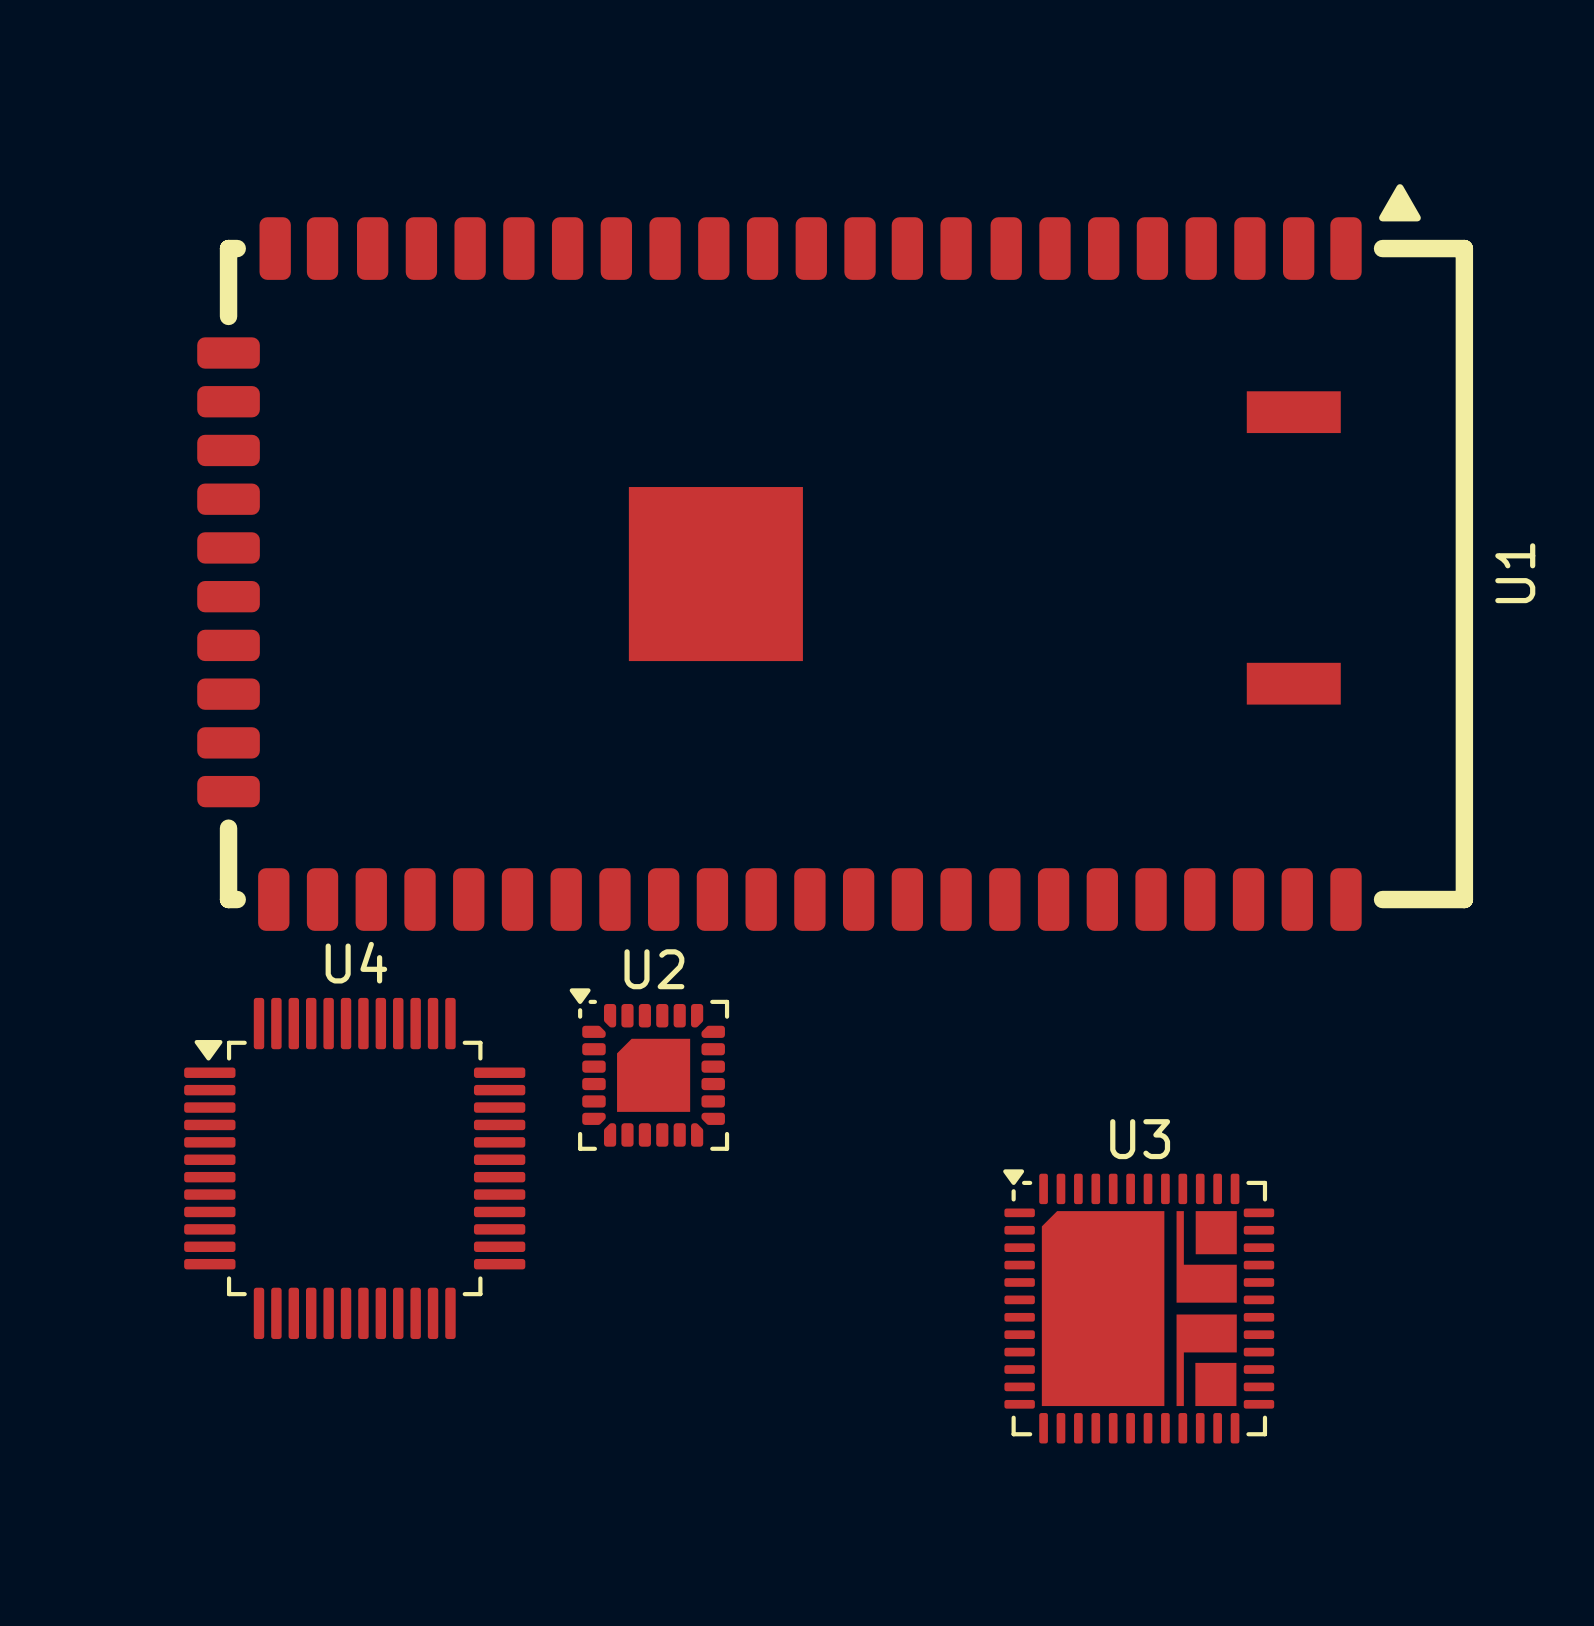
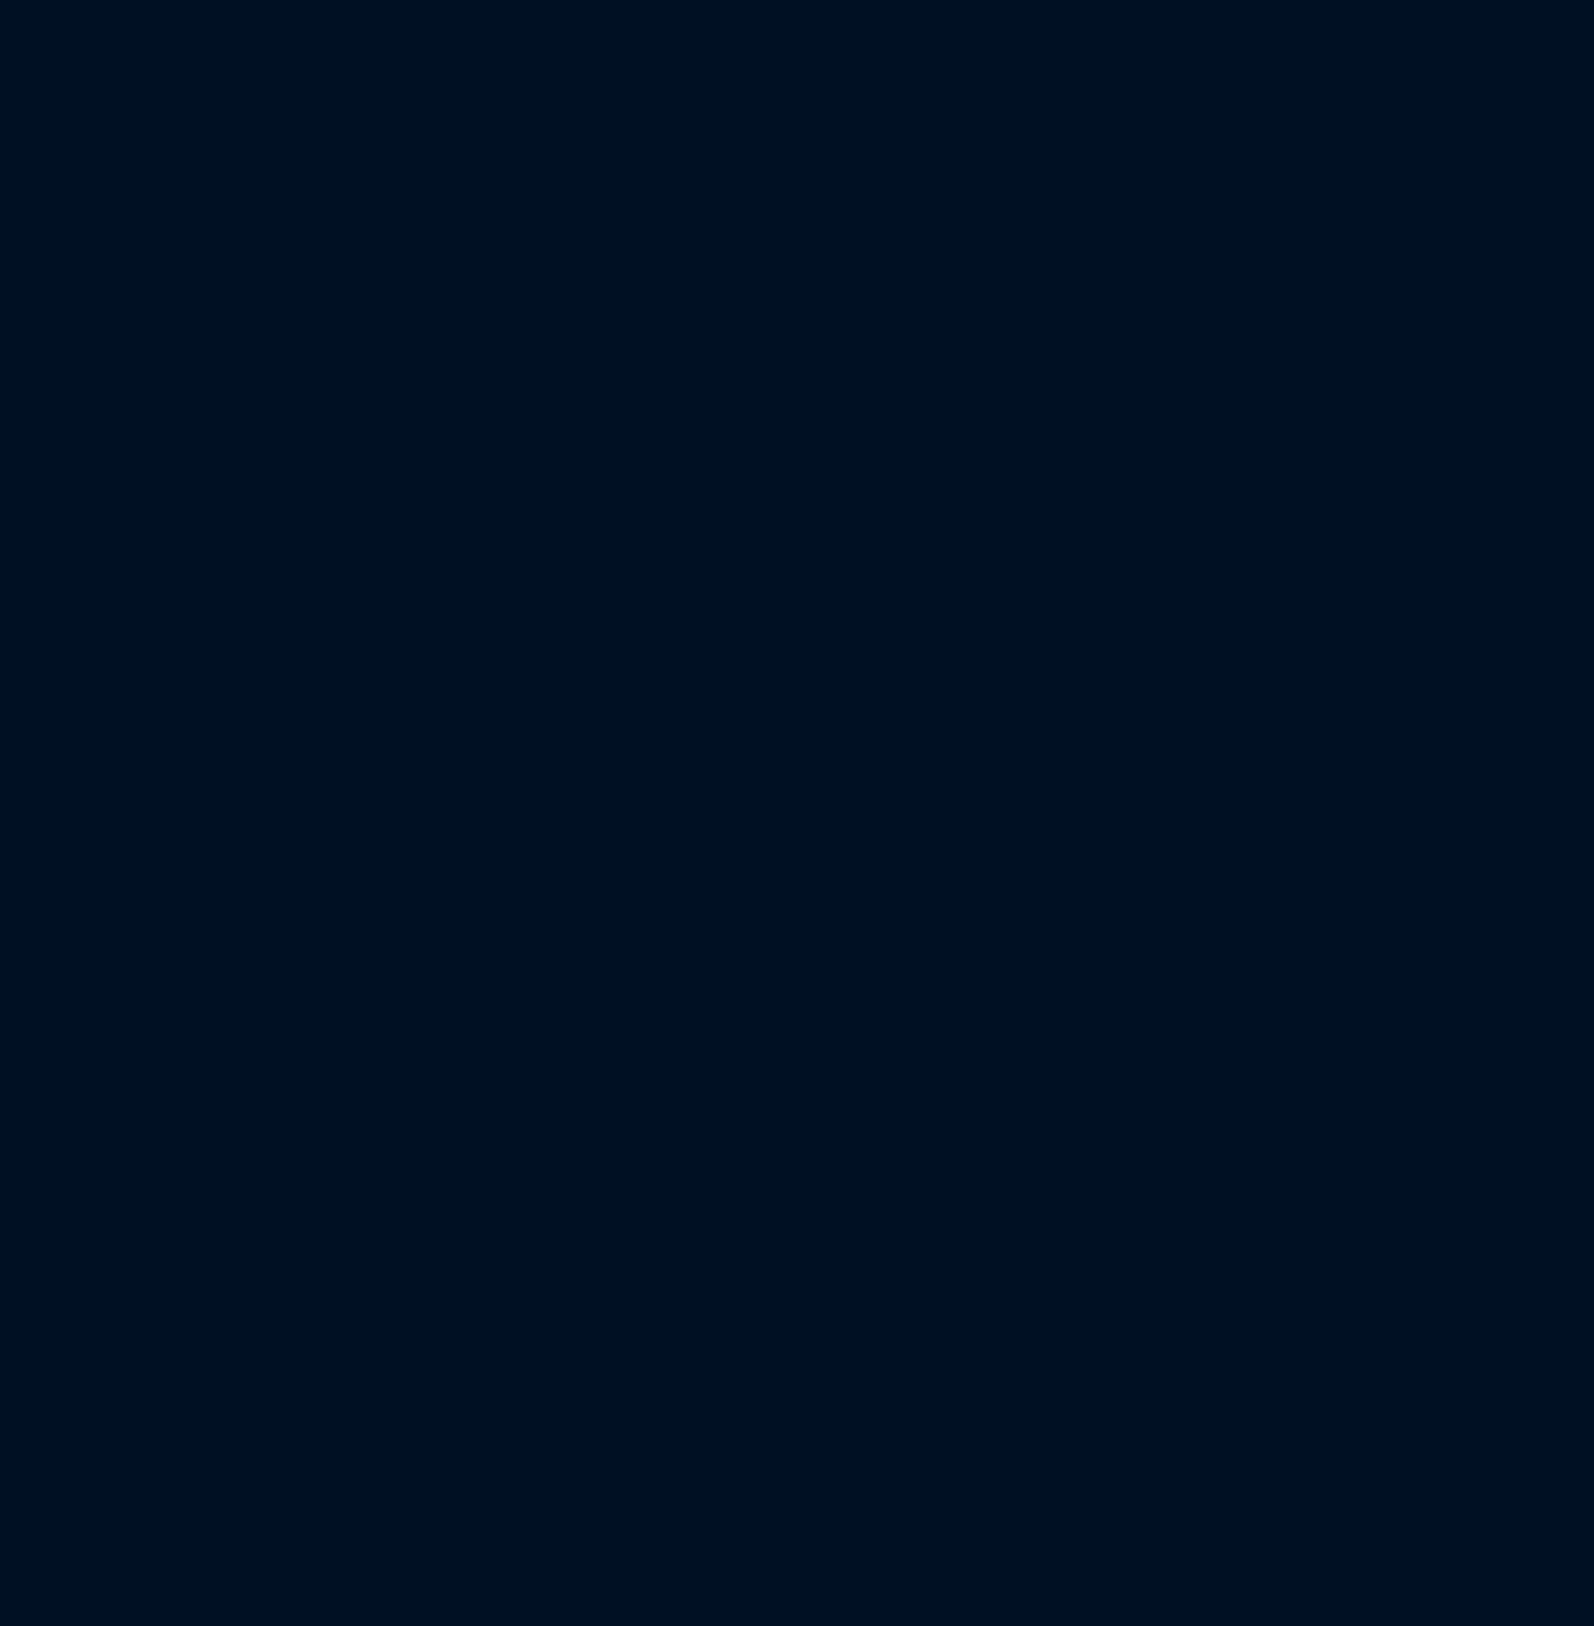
U1: (835, 557) -> none
U2: (649, 1069) -> none
U4: (354, 1168) -> none
U3: (1138, 1306) -> none

